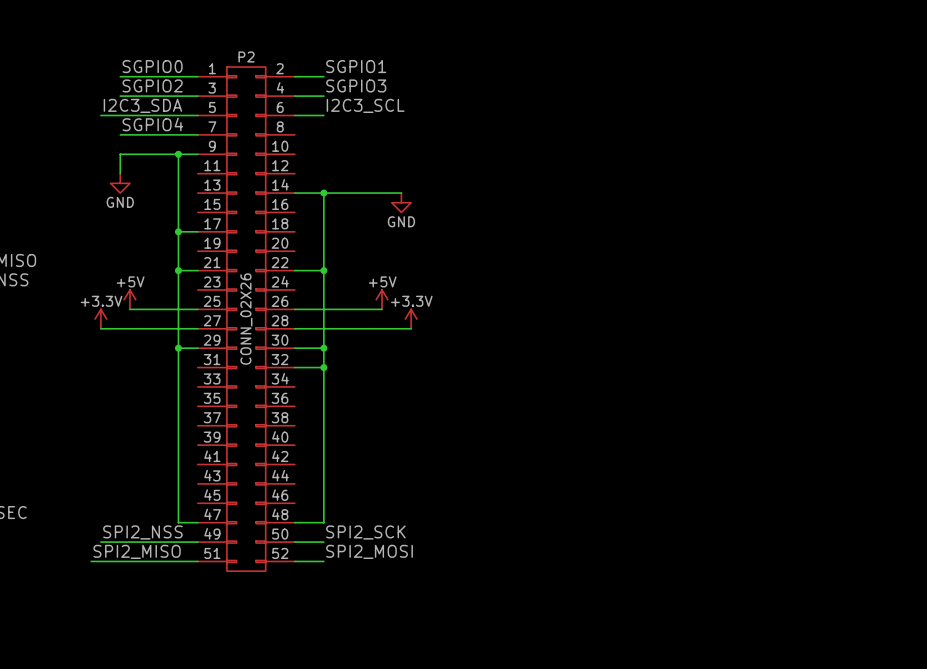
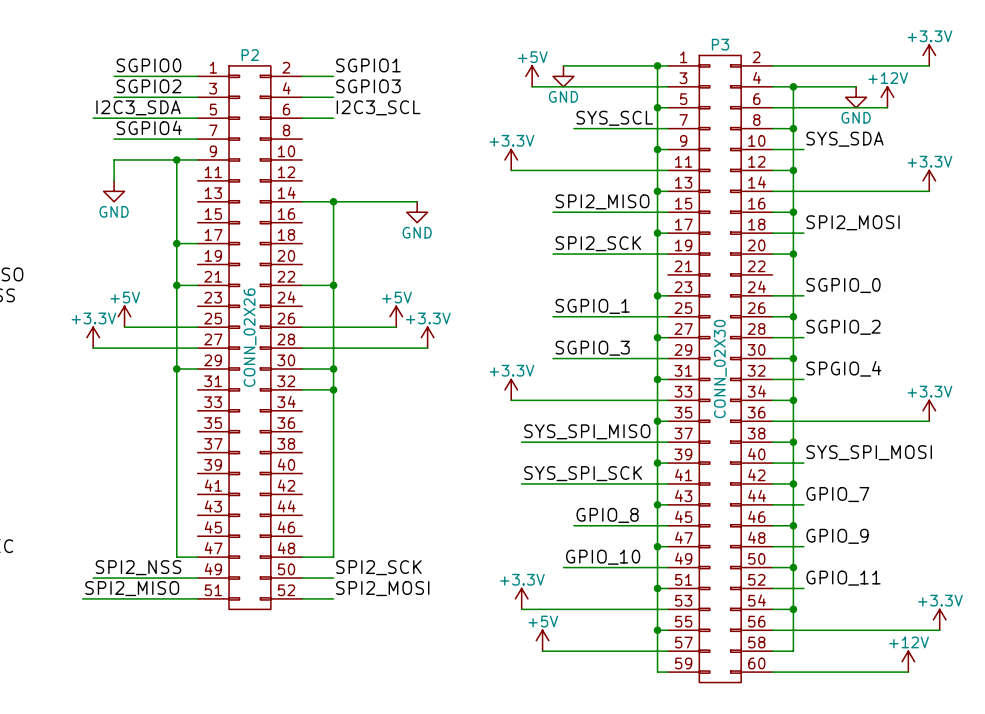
power symbol: none -> +3.3V (929, 55)
wire: none -> (563, 65) (667, 65)
wire: none -> (657, 65) (657, 672) (667, 672)
junction: none -> (657, 65)
wire: none -> (772, 65) (929, 65)
power symbol: none -> +5V (532, 76)
power symbol: none -> GND (563, 76)
wire: none -> (532, 86) (667, 86)
wire: none -> (772, 86) (856, 86)
wire: none -> (793, 86) (793, 651) (772, 651)
junction: none -> (793, 86)
power symbol: none -> GND (856, 97)
power symbol: none -> +12V (887, 97)
wire: none -> (657, 107) (667, 107)
junction: none -> (657, 107)
wire: none -> (772, 107) (887, 107)
label: none -> SYS_SCL (614, 118)
wire: none -> (573, 128) (667, 128)
wire: none -> (772, 128) (793, 128)
junction: none -> (793, 128)
label: none -> SYS_SDA (844, 139)
wire: none -> (657, 149) (667, 149)
junction: none -> (657, 149)
wire: none -> (772, 149) (803, 149)
power symbol: none -> +3.3V (511, 159)
wire: none -> (511, 170) (667, 170)
wire: none -> (772, 170) (793, 170)
junction: none -> (793, 170)
power symbol: none -> +3.3V (929, 180)
wire: none -> (657, 191) (667, 191)
junction: none -> (657, 191)
wire: none -> (772, 191) (929, 191)
label: none -> SPI2_MISO (602, 201)
wire: none -> (553, 212) (667, 212)
wire: none -> (772, 212) (793, 212)
junction: none -> (793, 212)
label: none -> SPI2_MOSI (853, 222)
wire: none -> (657, 233) (667, 233)
junction: none -> (657, 233)
wire: none -> (772, 233) (803, 233)
label: none -> SPI2_SCK (598, 243)
wire: none -> (553, 254) (667, 254)
wire: none -> (772, 254) (793, 254)
junction: none -> (793, 254)
label: none -> SGPIO_0 (843, 285)
wire: none -> (657, 295) (667, 295)
junction: none -> (657, 295)
wire: none -> (772, 295) (803, 295)
label: none -> SGPIO_1 (592, 306)
wire: none -> (553, 316) (667, 316)
wire: none -> (772, 316) (793, 316)
junction: none -> (793, 316)
label: none -> SGPIO_2 (843, 327)
wire: none -> (657, 337) (667, 337)
junction: none -> (657, 337)
wire: none -> (772, 337) (803, 337)
label: none -> SGPIO_3 (592, 348)
wire: none -> (553, 358) (667, 358)
wire: none -> (772, 358) (793, 358)
junction: none -> (793, 358)
label: none -> SPGIO_4 (843, 368)
P3: none -> CONN_02X30 (720, 369)
wire: none -> (657, 379) (667, 379)
junction: none -> (657, 379)
wire: none -> (772, 379) (803, 379)
power symbol: none -> +3.3V (511, 389)
wire: none -> (511, 400) (667, 400)
wire: none -> (772, 400) (793, 400)
junction: none -> (793, 400)
power symbol: none -> +3.3V (929, 410)
wire: none -> (657, 421) (667, 421)
junction: none -> (657, 421)
wire: none -> (772, 421) (929, 421)
label: none -> SYS_SPI_MISO (587, 431)
wire: none -> (521, 442) (667, 442)
wire: none -> (772, 442) (793, 442)
junction: none -> (793, 442)
label: none -> SYS_SPI_MOSI (869, 452)
wire: none -> (657, 463) (667, 463)
junction: none -> (657, 463)
wire: none -> (772, 463) (803, 463)
label: none -> SYS_SPI_SCK (583, 473)
wire: none -> (521, 483) (667, 483)
wire: none -> (772, 483) (793, 483)
junction: none -> (793, 483)
label: none -> GPIO_7 (837, 494)
wire: none -> (657, 504) (667, 504)
junction: none -> (657, 504)
wire: none -> (772, 504) (803, 504)
label: none -> GPIO_8 (607, 515)
wire: none -> (573, 525) (667, 525)
wire: none -> (772, 525) (793, 525)
junction: none -> (793, 525)
label: none -> GPIO_9 (837, 536)
wire: none -> (657, 546) (667, 546)
junction: none -> (657, 546)
wire: none -> (772, 546) (803, 546)
label: none -> GPIO_10 (603, 557)
wire: none -> (563, 567) (667, 567)
wire: none -> (772, 567) (793, 567)
junction: none -> (793, 567)
label: none -> GPIO_11 (843, 578)
wire: none -> (657, 588) (667, 588)
junction: none -> (657, 588)
wire: none -> (772, 588) (803, 588)
power symbol: none -> +3.3V (521, 598)
wire: none -> (521, 609) (667, 609)
wire: none -> (772, 609) (793, 609)
junction: none -> (793, 609)
power symbol: none -> +3.3V (939, 619)
wire: none -> (657, 630) (667, 630)
junction: none -> (657, 630)
wire: none -> (772, 630) (939, 630)
power symbol: none -> +5V (542, 640)
wire: none -> (542, 651) (667, 651)
power symbol: none -> +12V (908, 661)
wire: none -> (772, 672) (908, 672)

